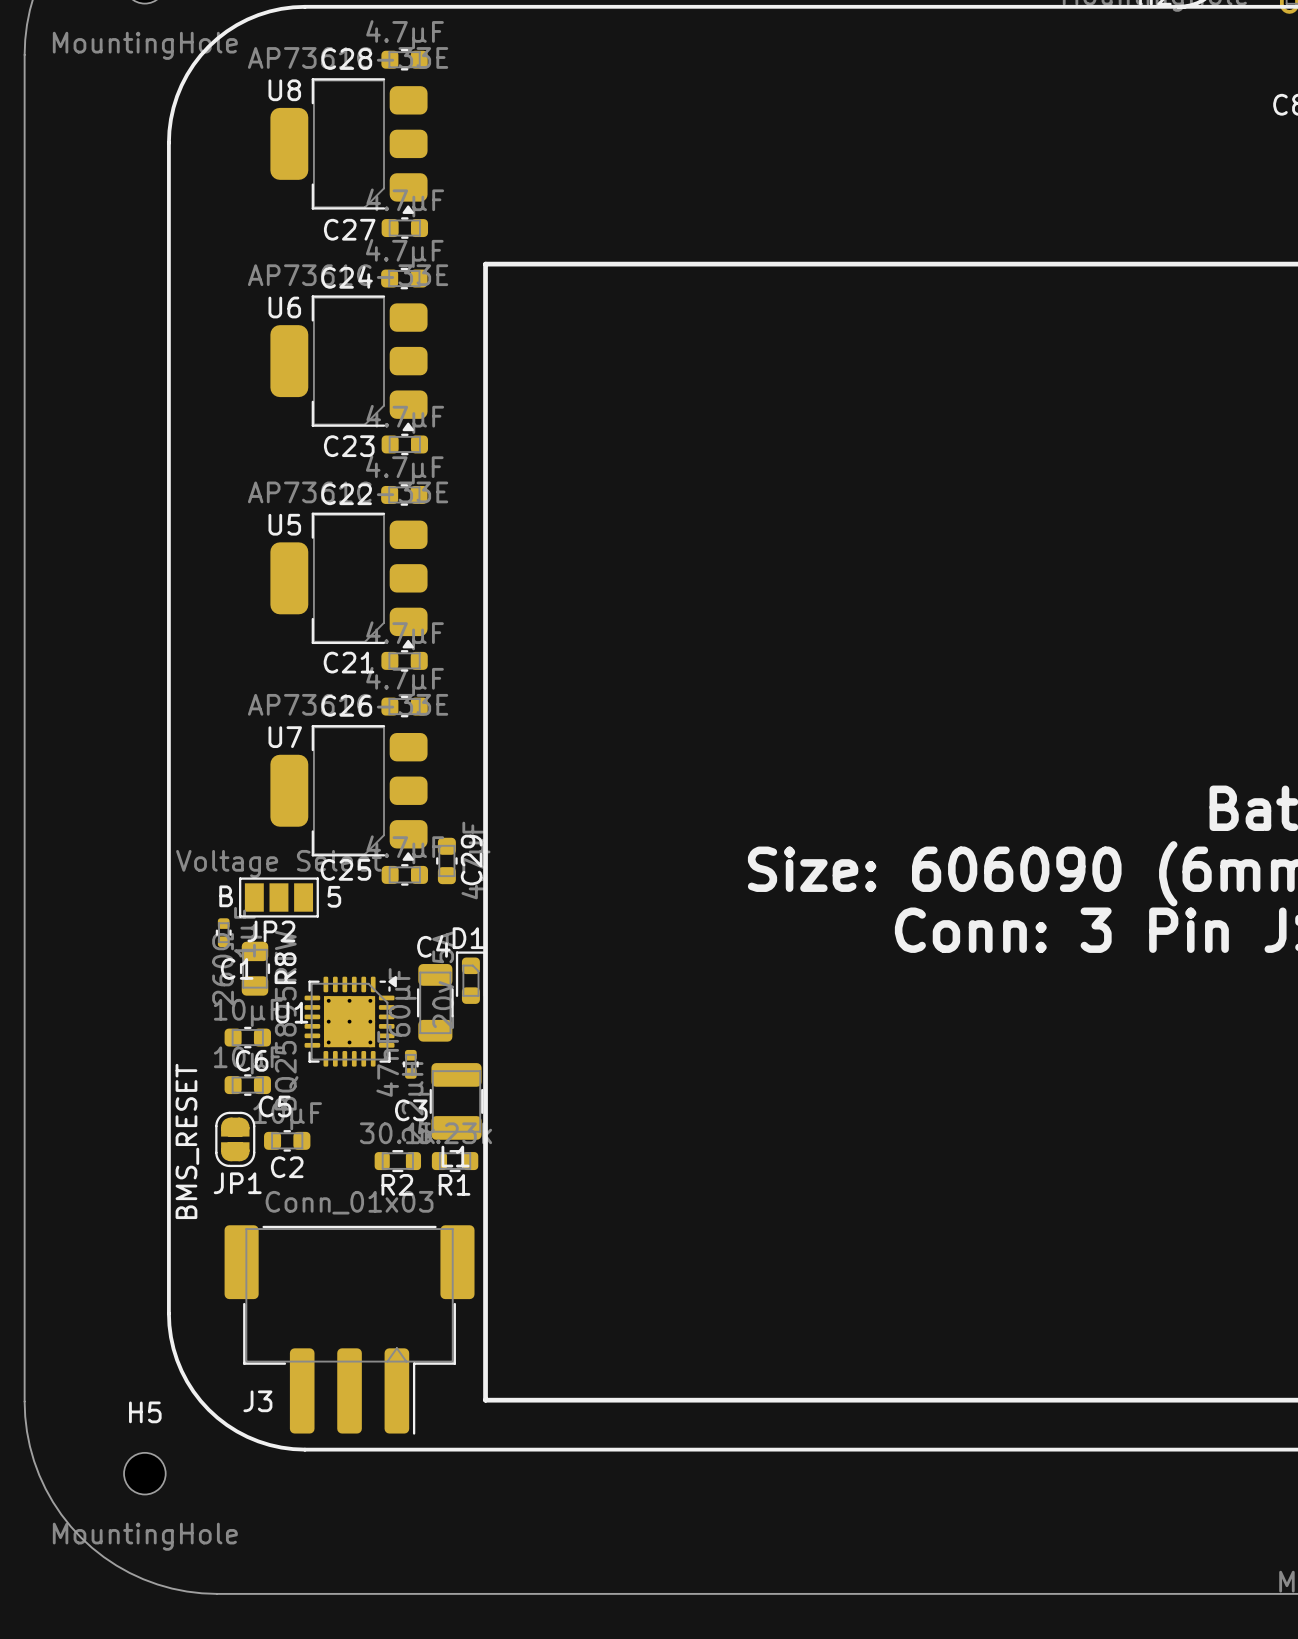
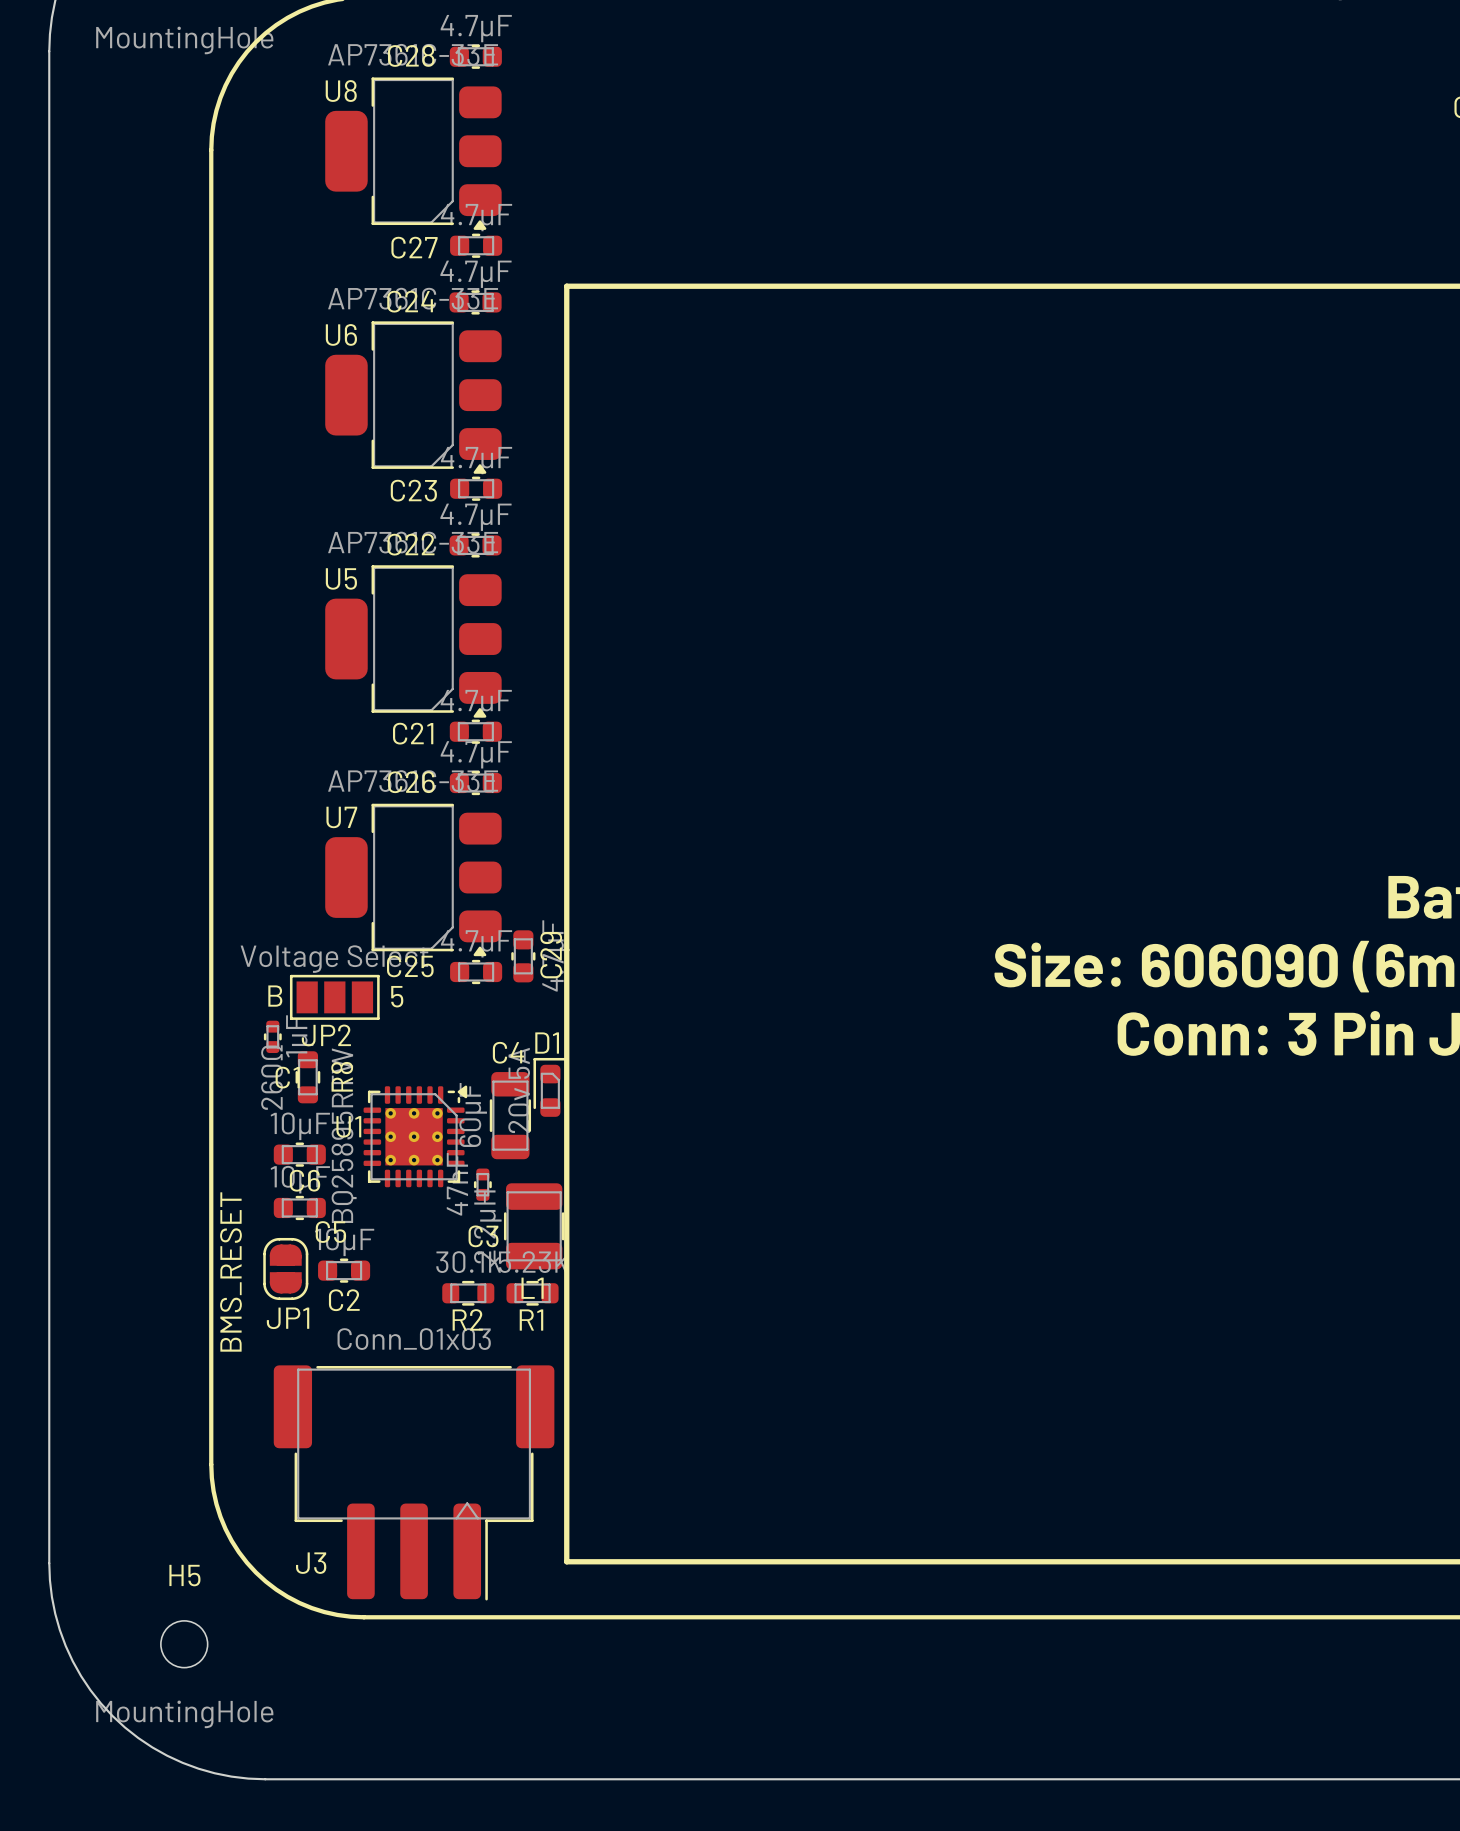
R8 footprint: [239, 941, 271, 996] -> [295, 1051, 321, 1104]

